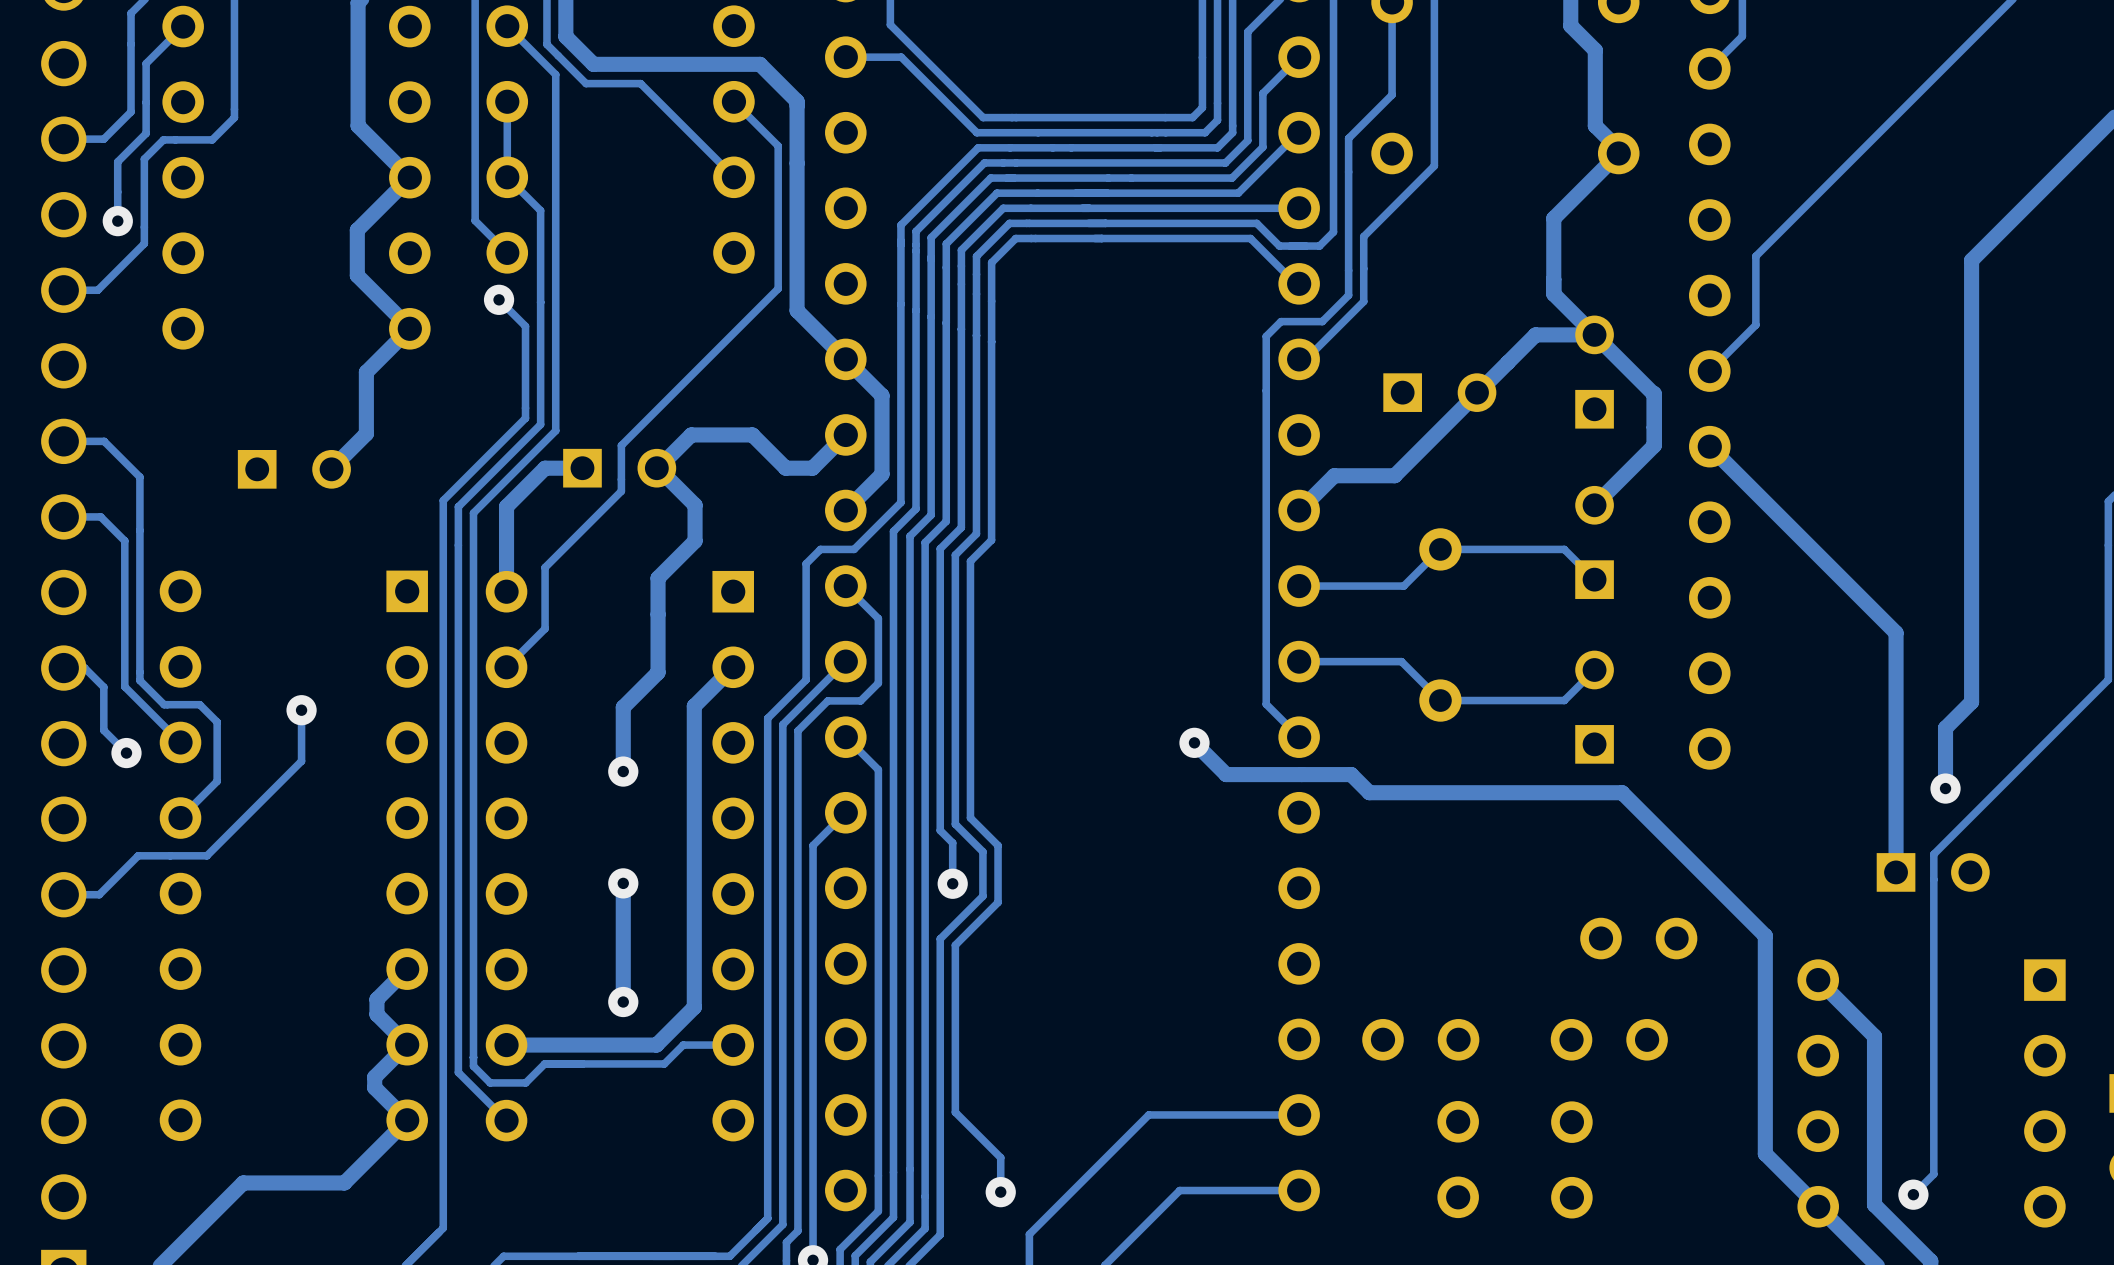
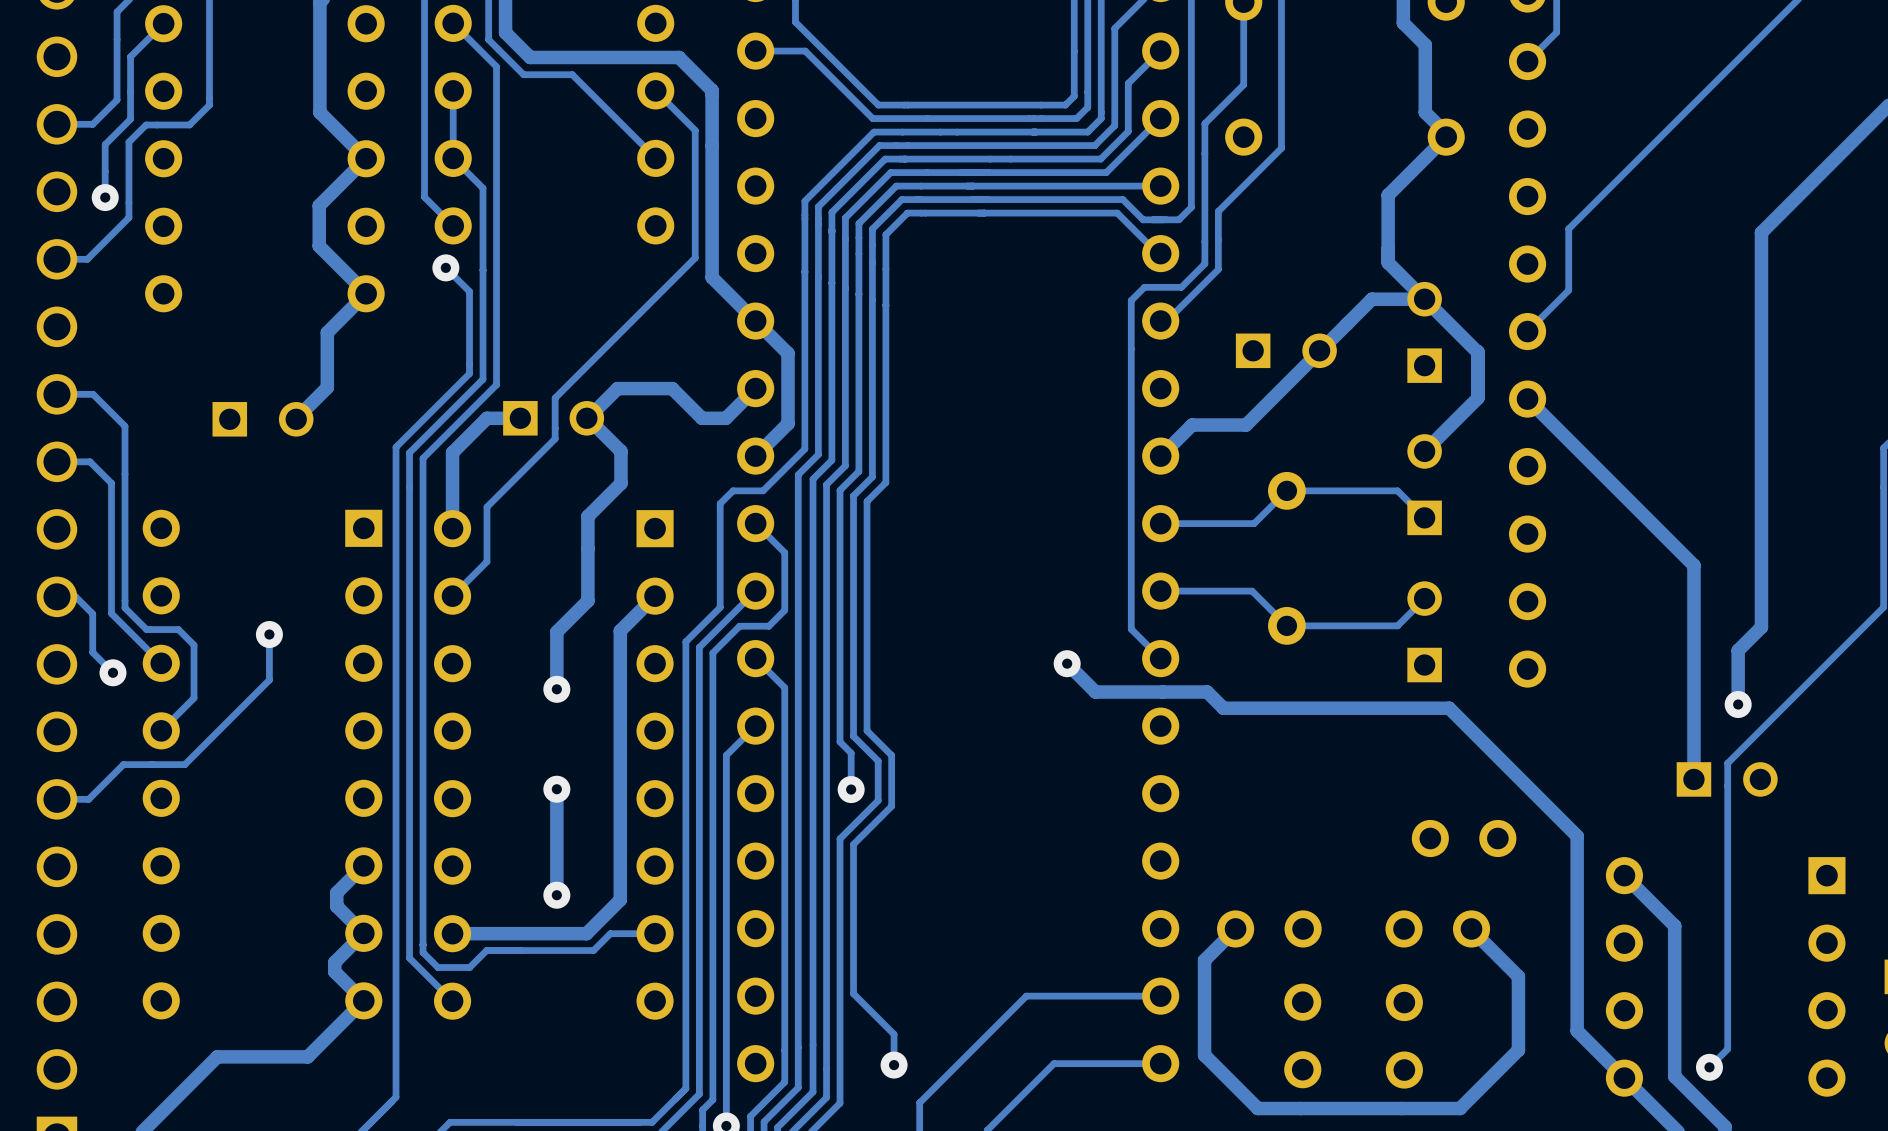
track: none -> (1471, 929) (1518, 976) (1518, 1050) (1460, 1108) (1257, 1108) (1204, 1055) (1204, 960) (1234, 929)

